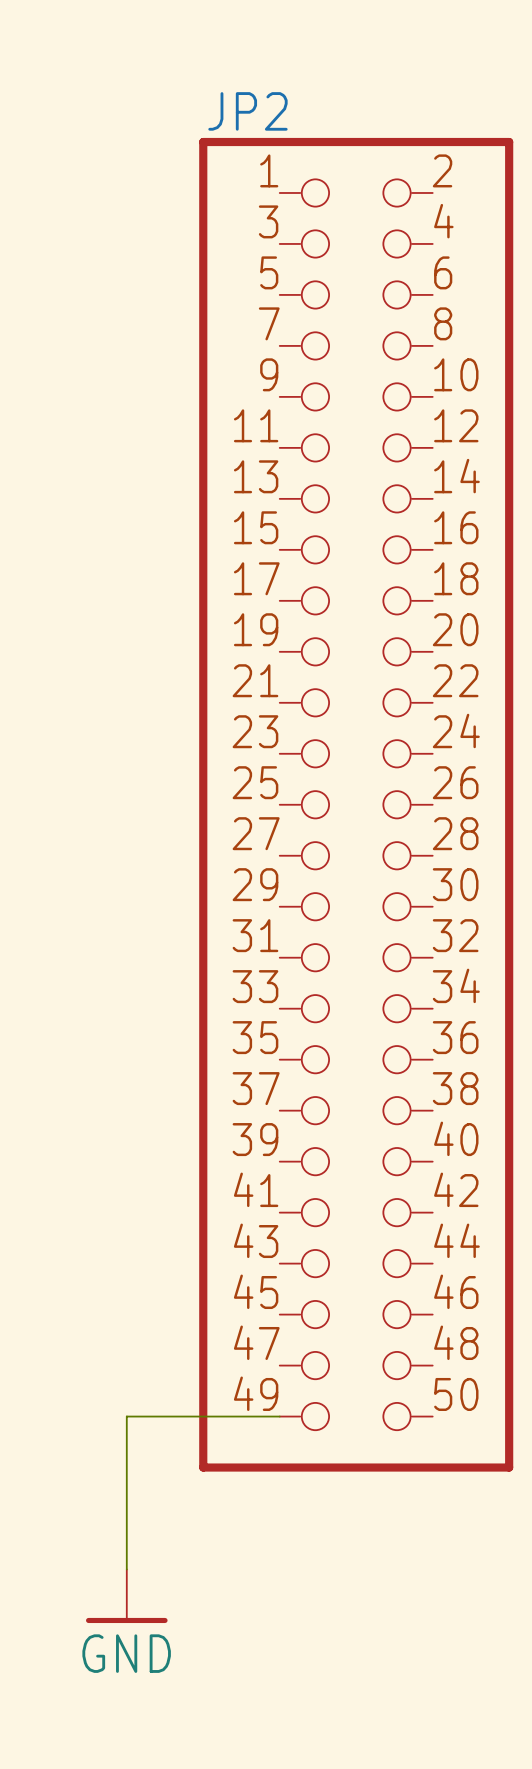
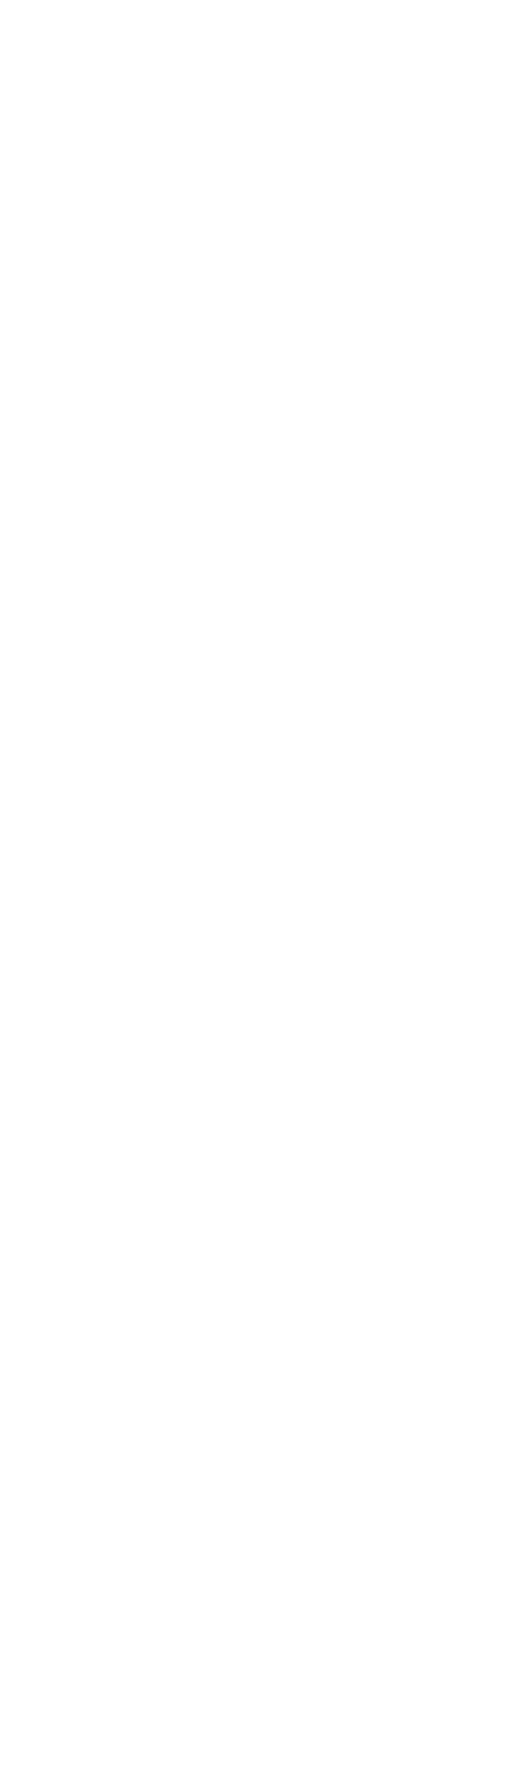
JP2: (356, 804) -> none
wire: (279, 1416) (126, 1416) (126, 1569) -> none
power symbol: GND (126, 1596) -> none

